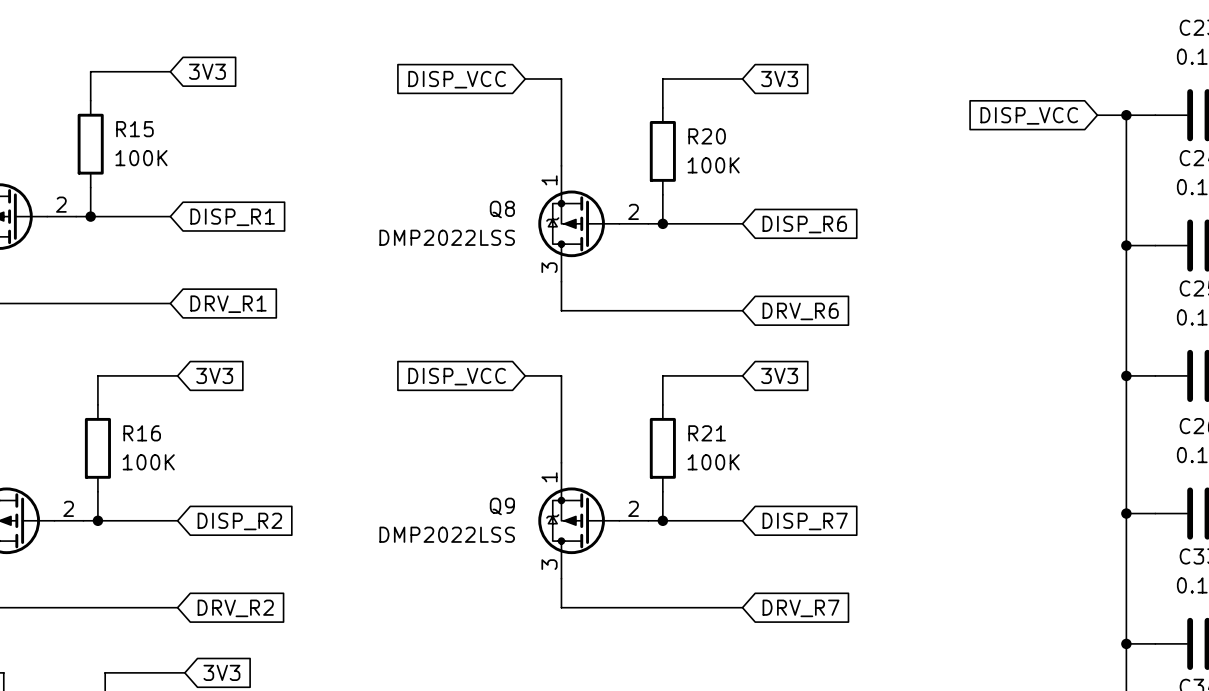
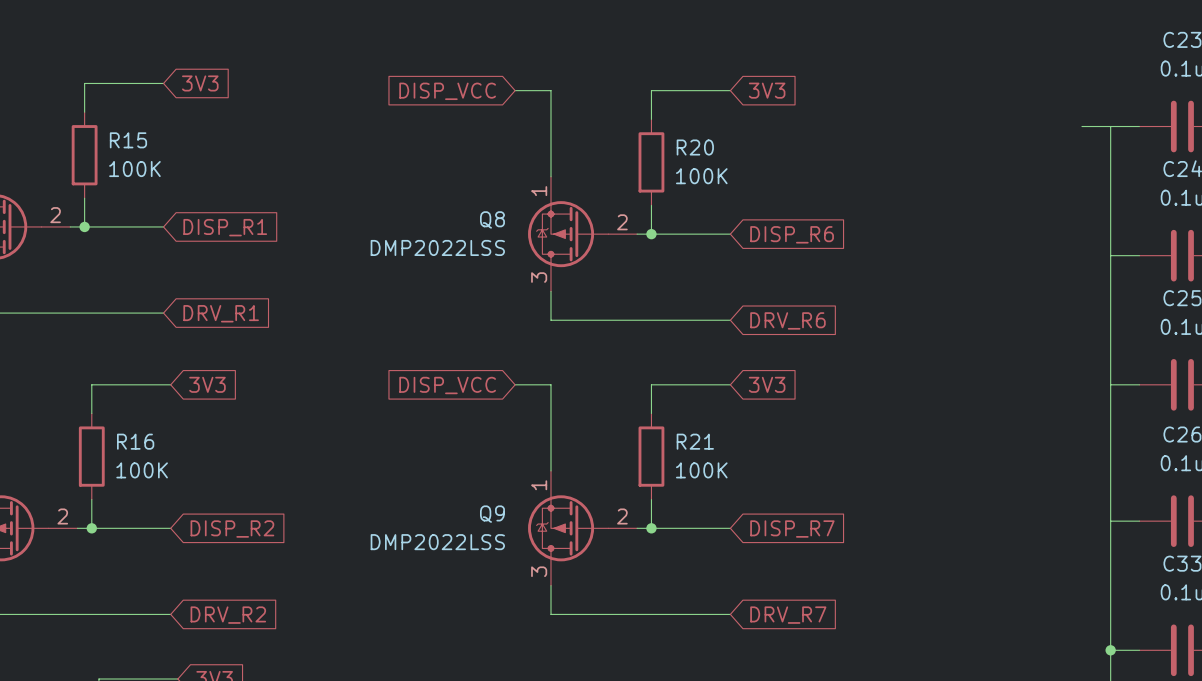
global label: DISP_VCC (1029, 115) -> none
junction: (1126, 115) -> none
junction: (1126, 245) -> none
junction: (1126, 375) -> none
junction: (1126, 513) -> none

